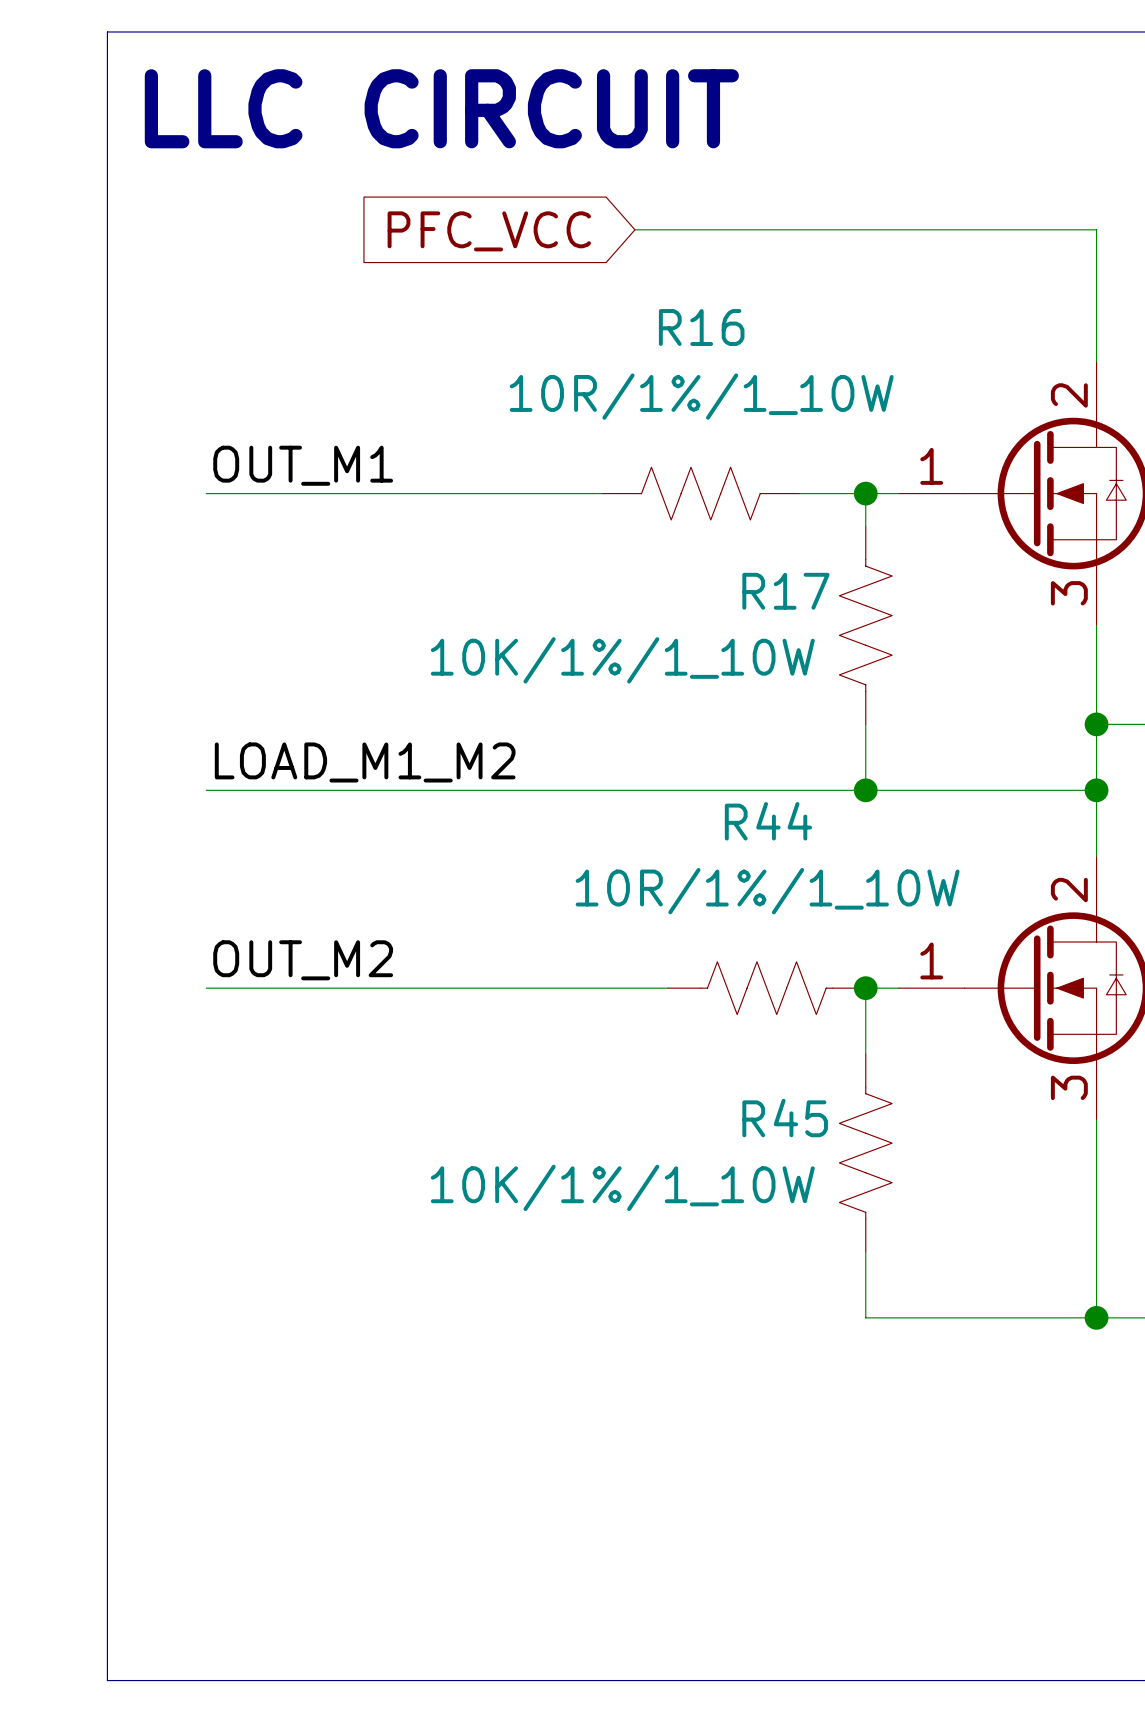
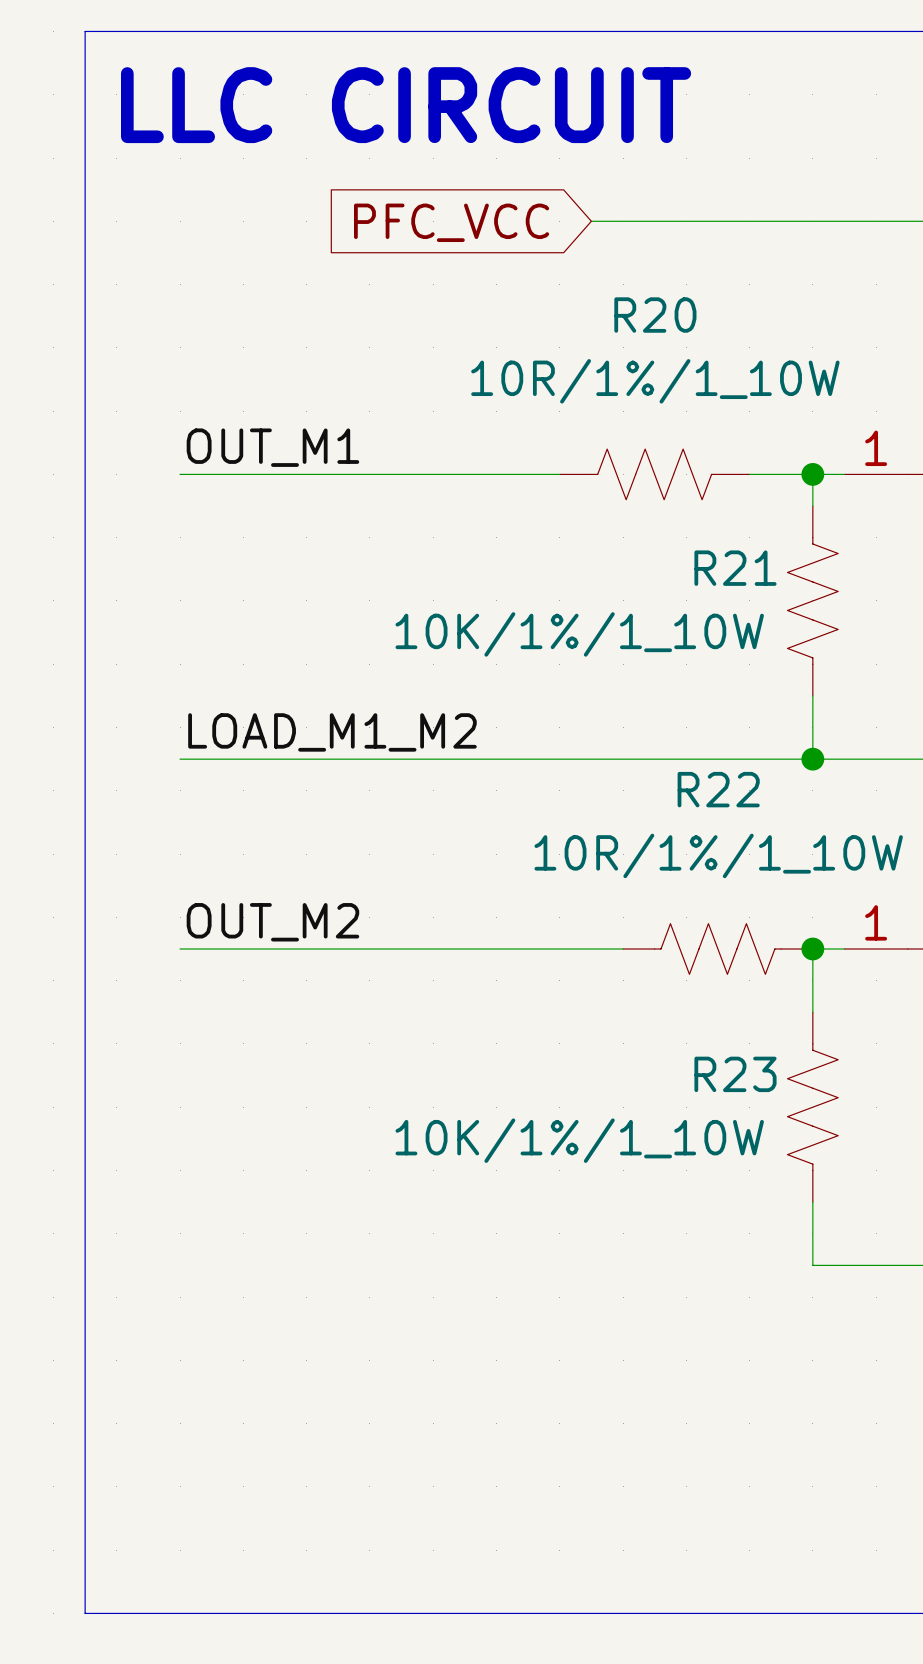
R16 name: R16 (701, 327) -> R20 (655, 315)
R17 name: R17 (785, 591) -> R21 (735, 568)
R44 name: R44 (768, 821) -> R22 (718, 789)
R45 name: R45 (785, 1118) -> R23 (735, 1074)

